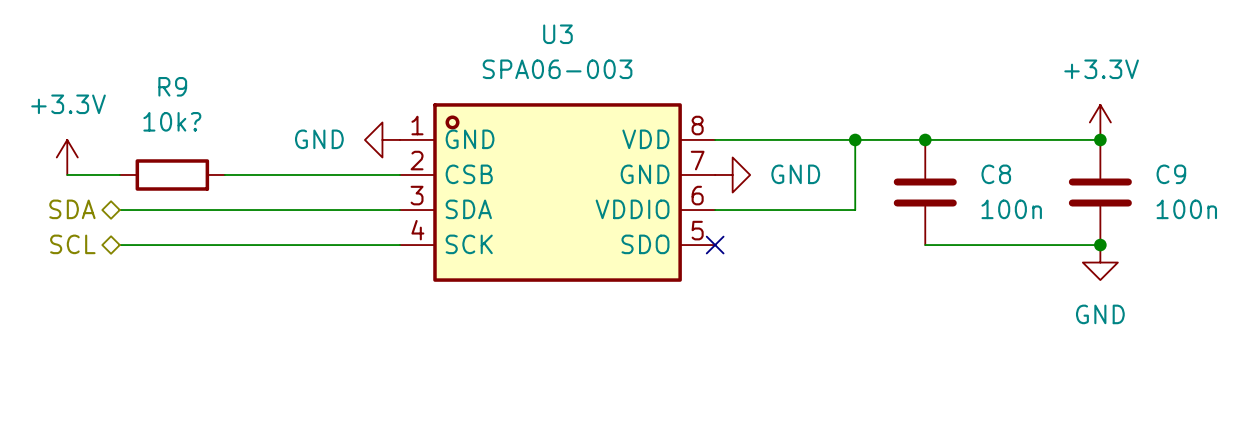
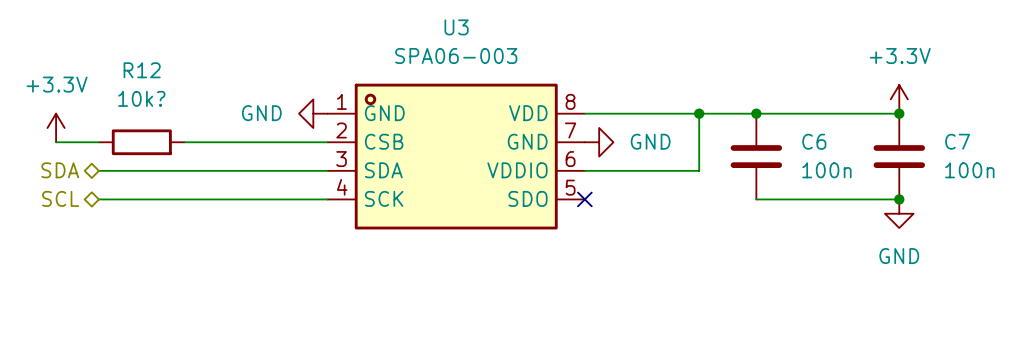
R9 name: R9 (172, 86) -> R12 (142, 70)
C8 name: C8 (996, 174) -> C6 (814, 141)
C9 name: C9 (1171, 174) -> C7 (957, 141)

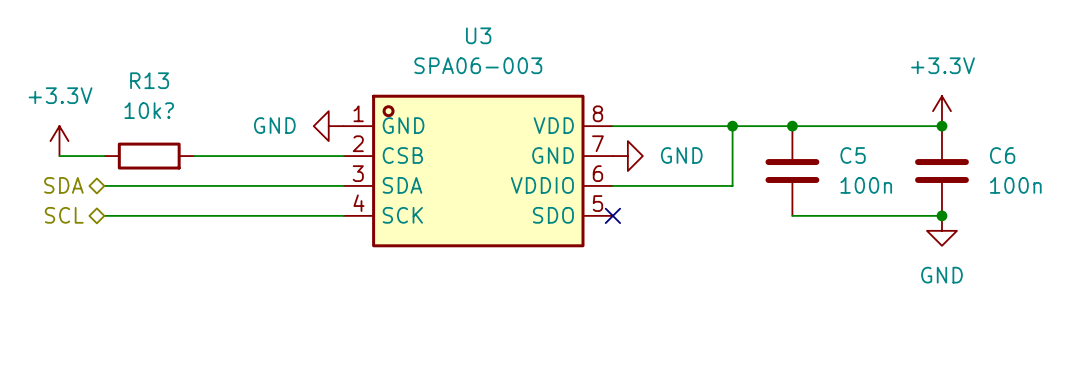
R12 name: R12 (142, 70) -> R13 (149, 80)
C6 name: C6 (814, 141) -> C5 (853, 155)
C7 name: C7 (957, 141) -> C6 (1002, 155)

